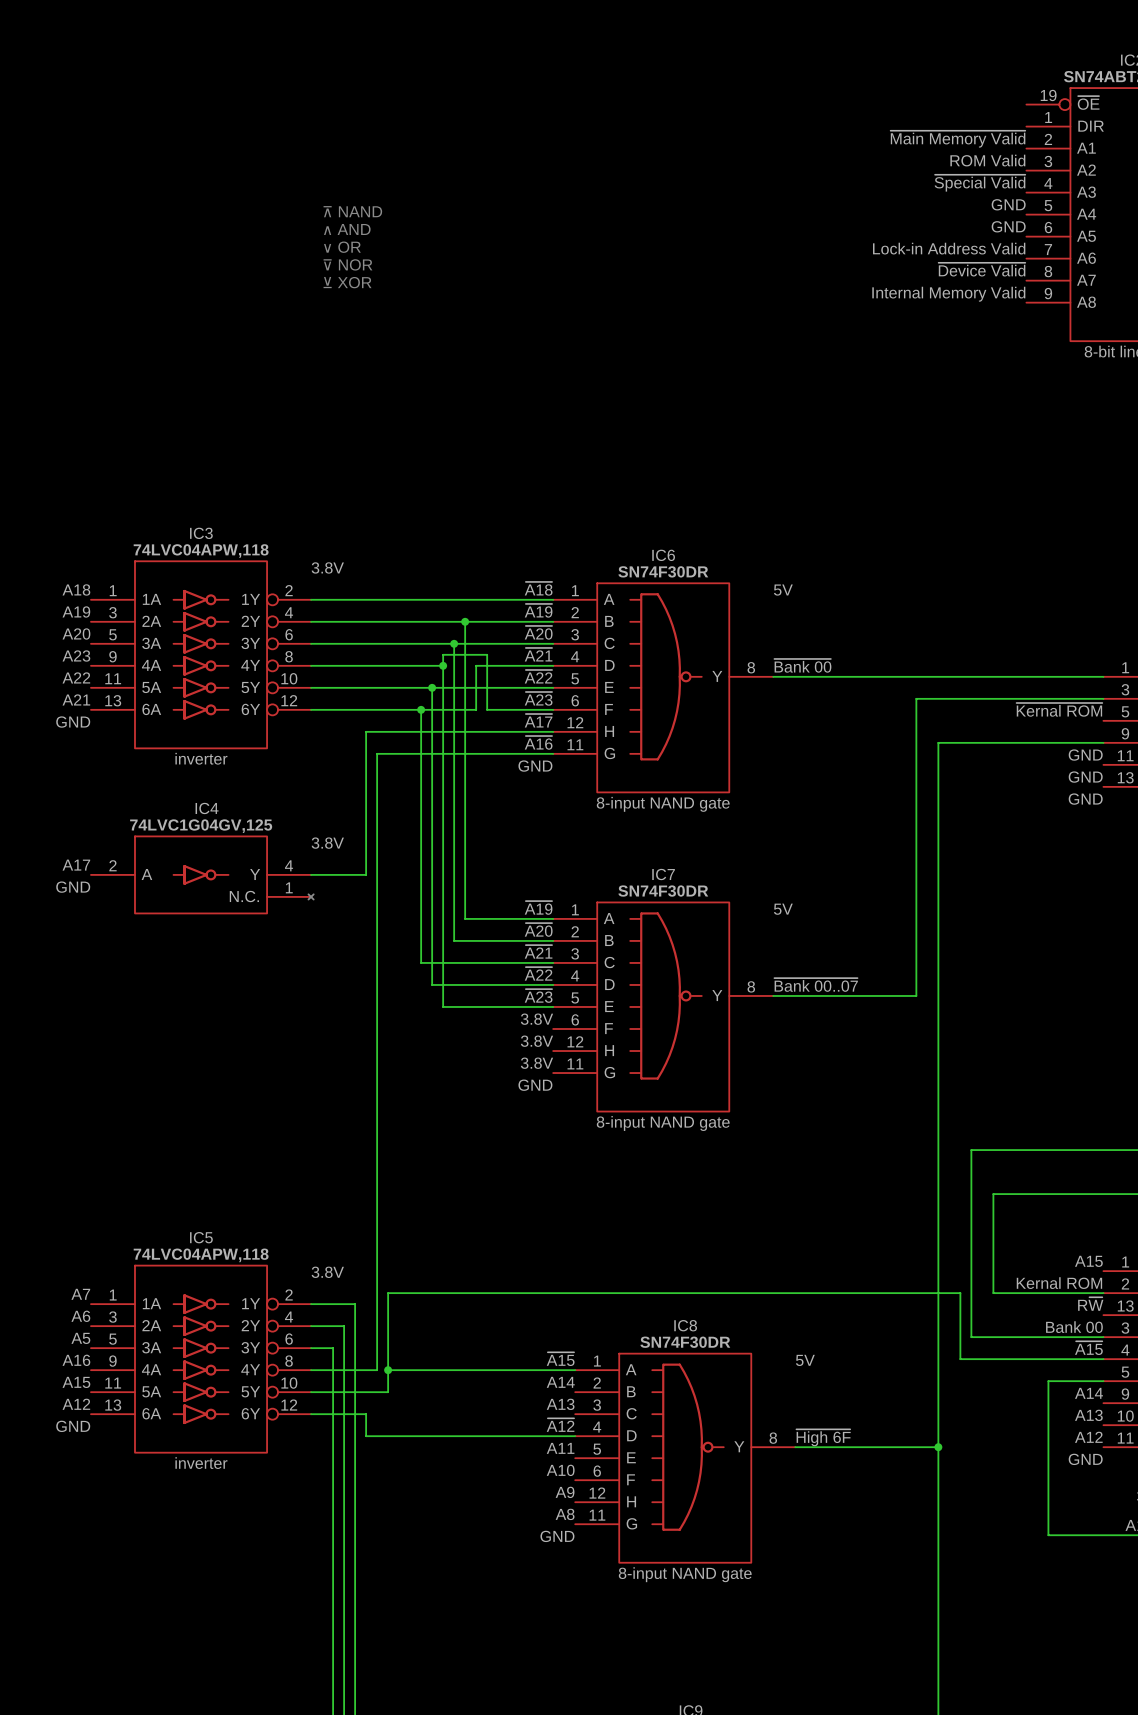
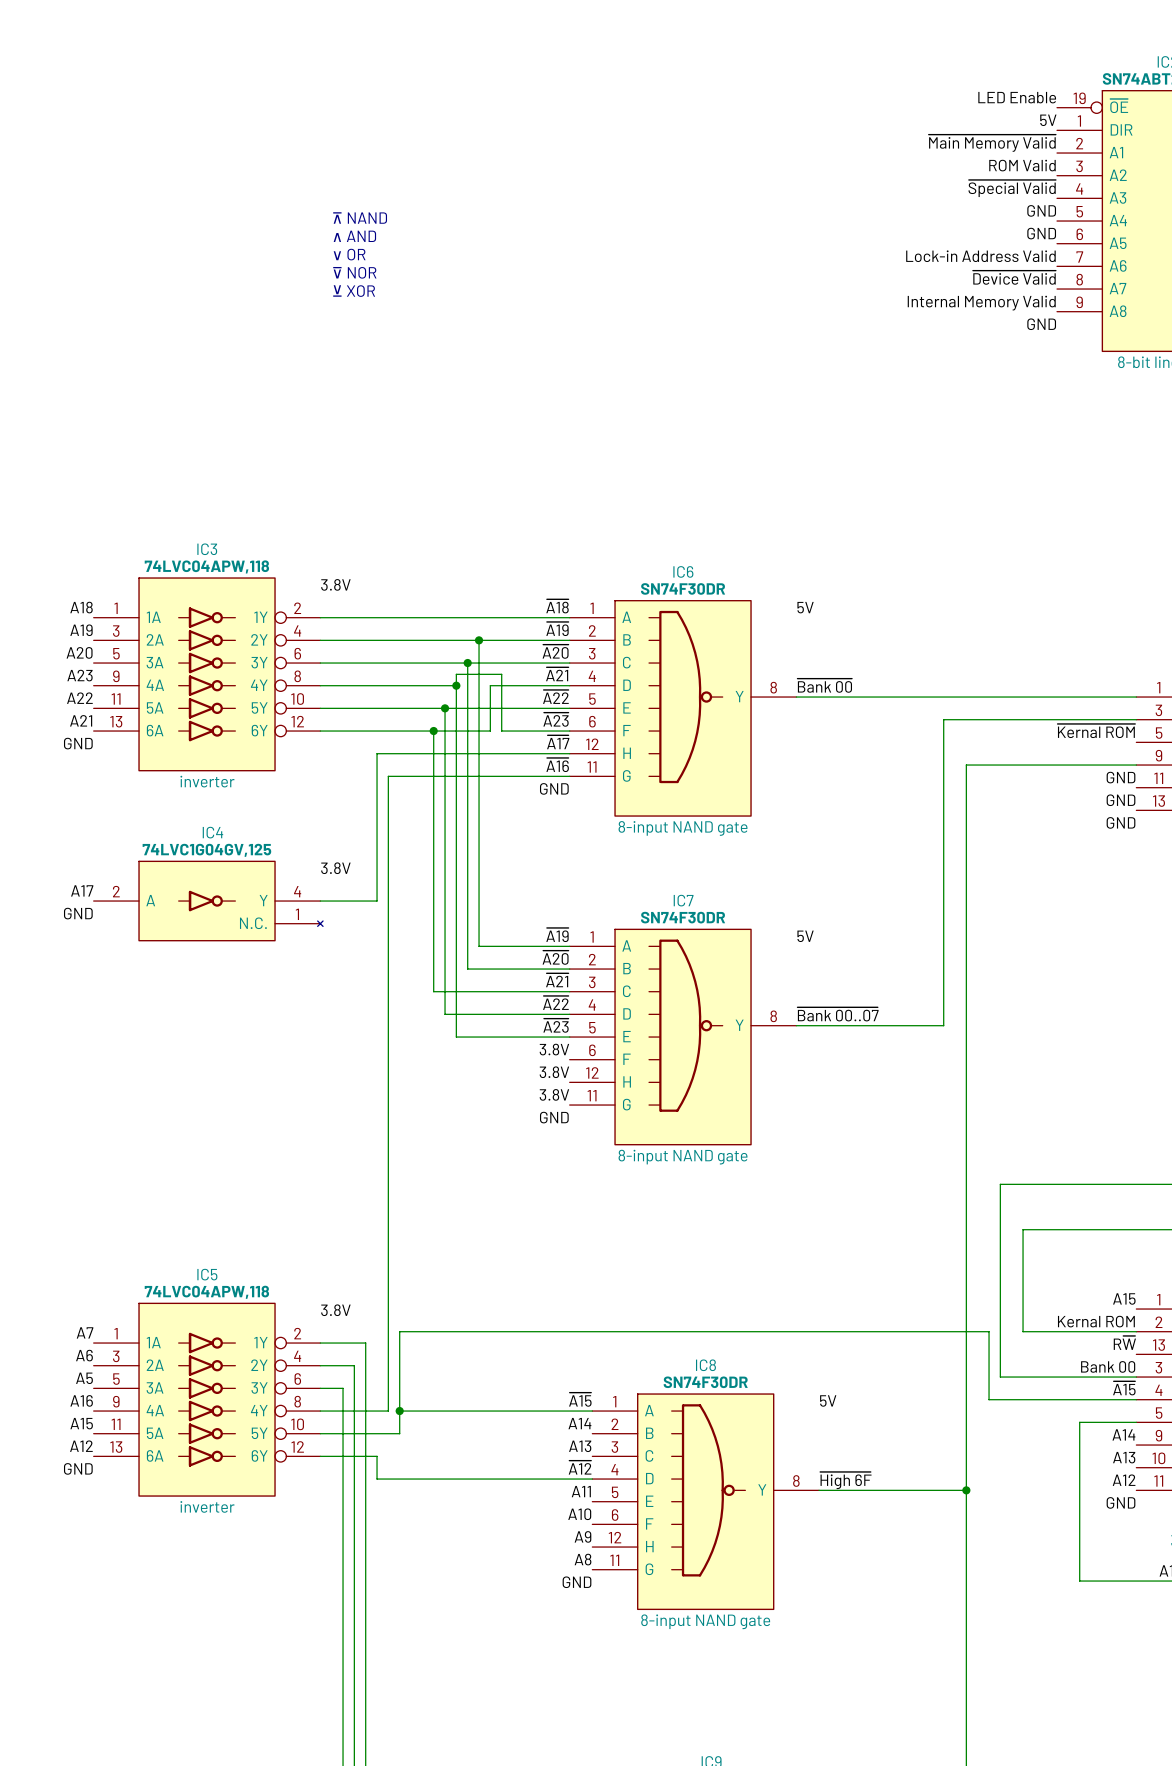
label: none -> LED Enable (1017, 97)
label: none -> 5V (1048, 120)
label: none -> GND (1041, 324)

